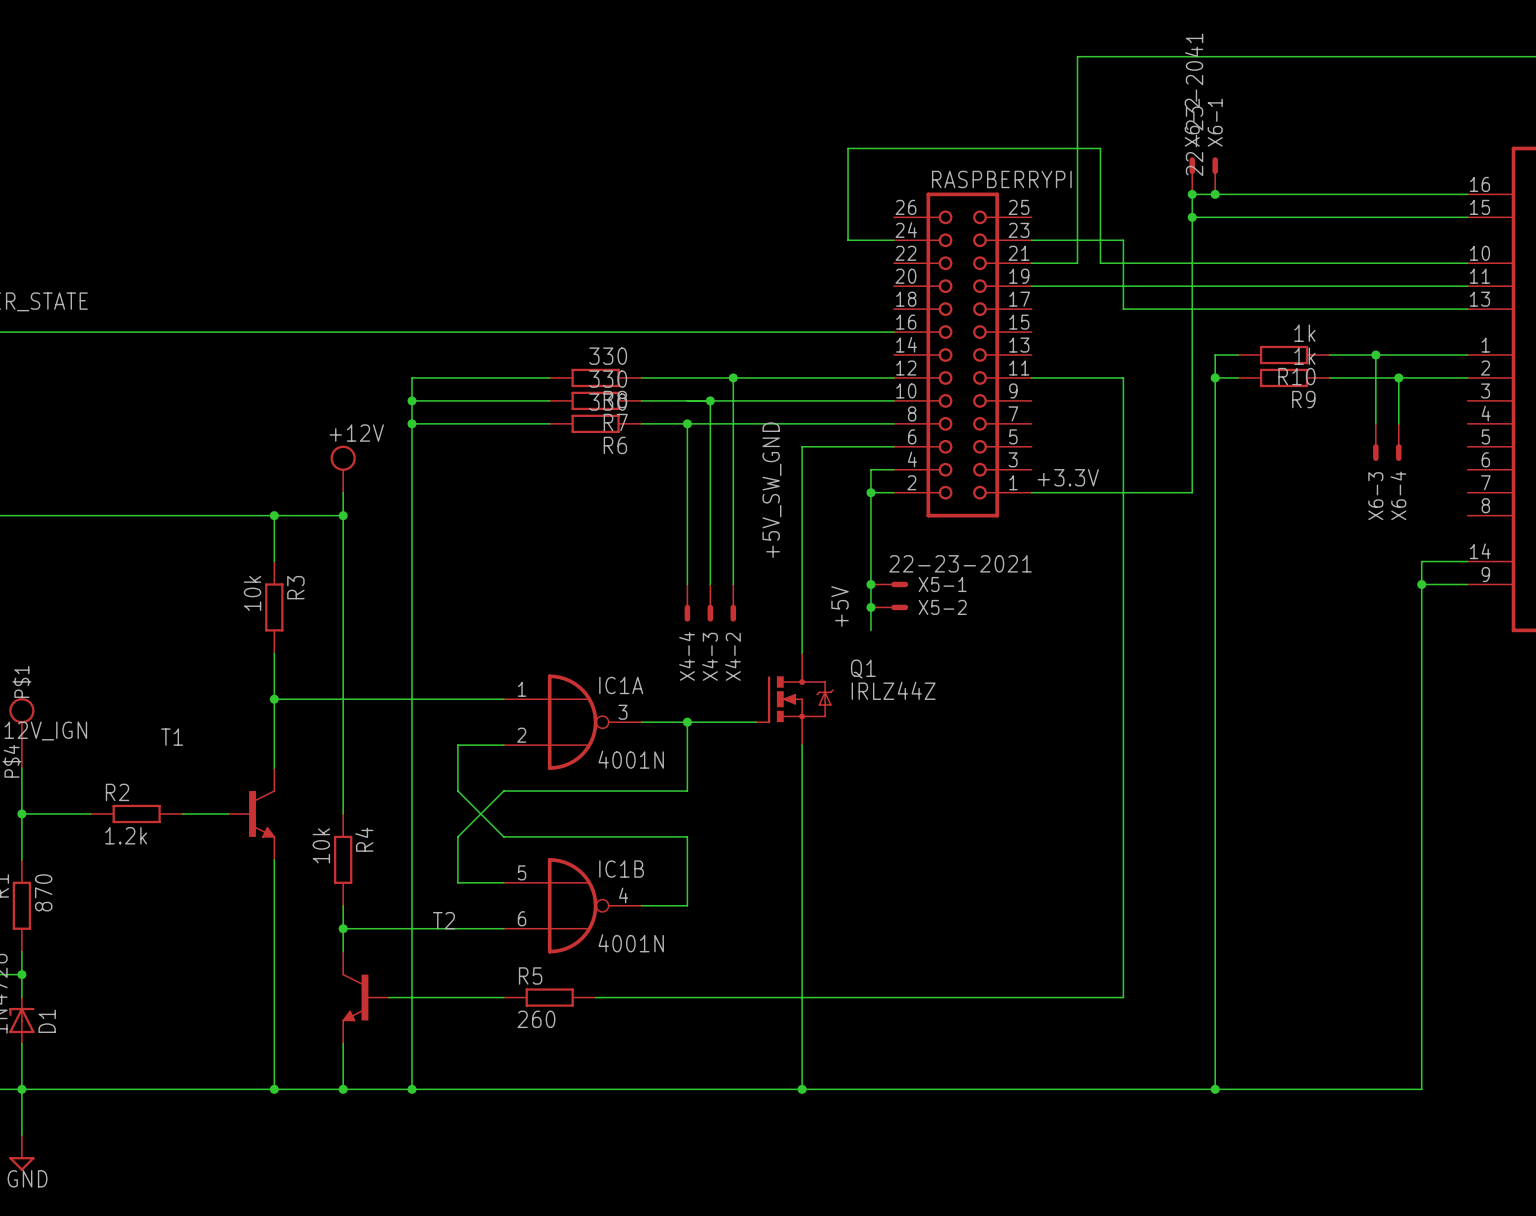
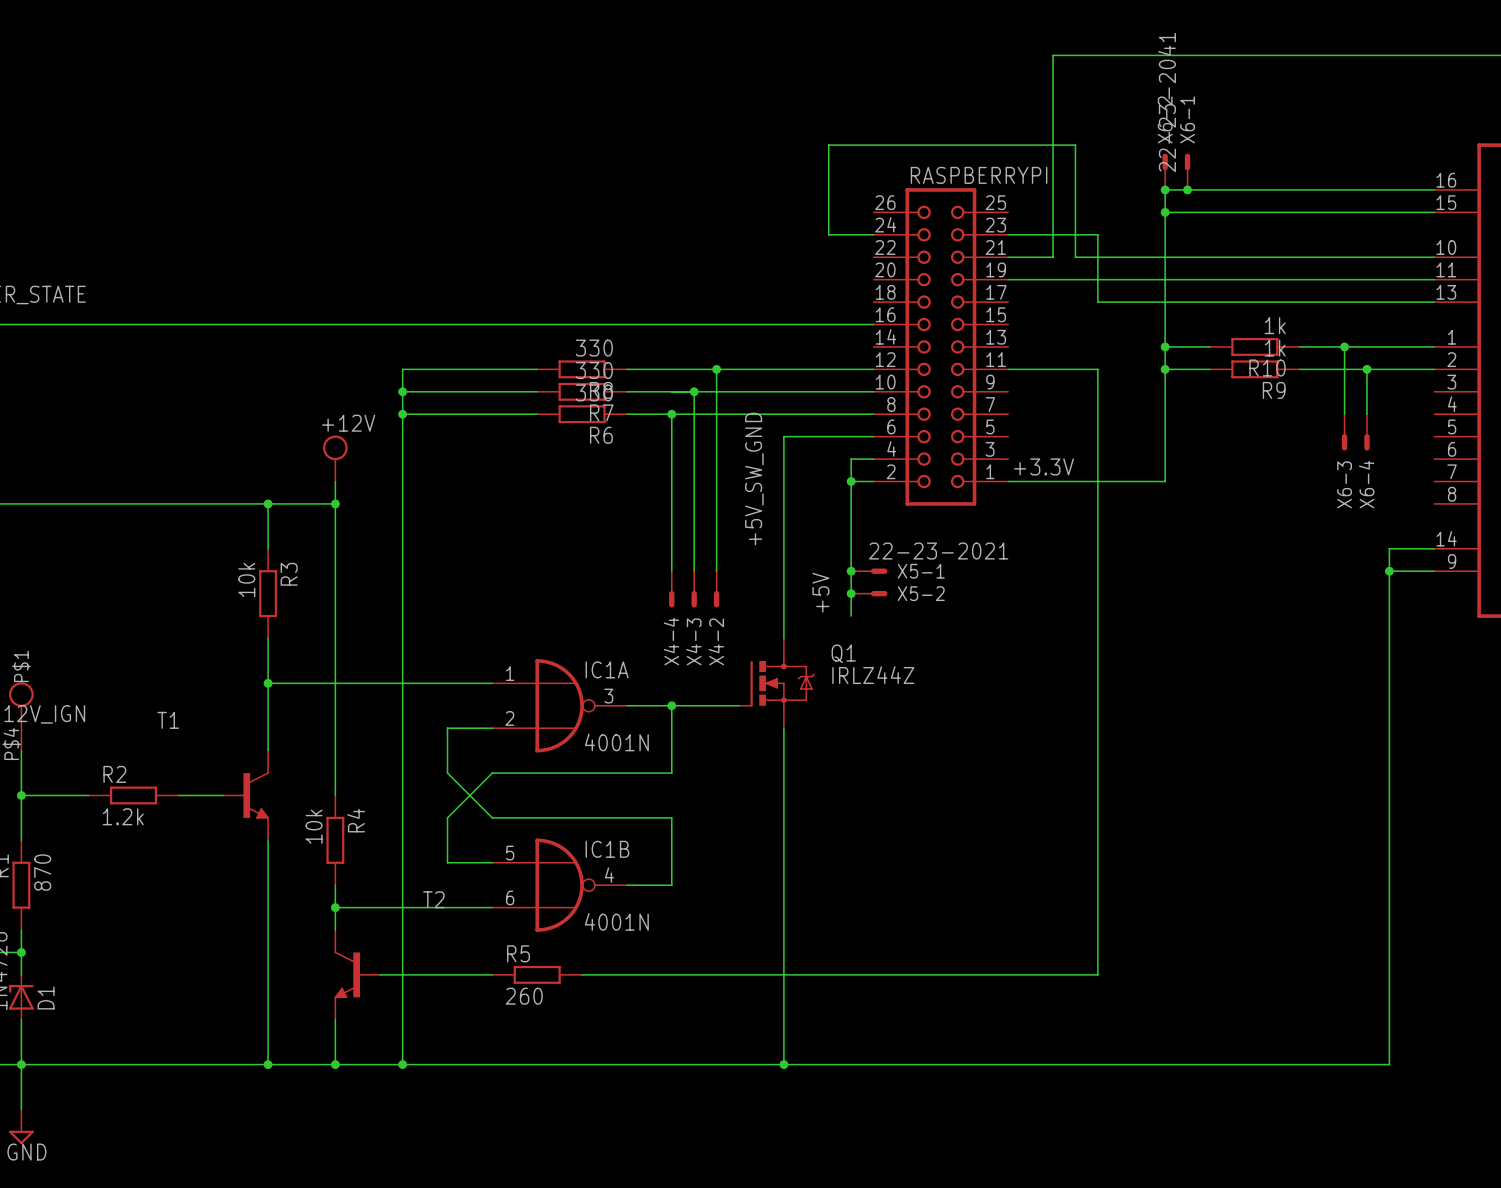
junction: none -> (1165, 346)
wire: (1215, 355) (1215, 1089) -> (1187, 346) (1165, 346)
wire: none -> (1165, 369) (1187, 369)
junction: none -> (1165, 369)
junction: (1215, 377) -> none
junction: (1215, 1089) -> none

